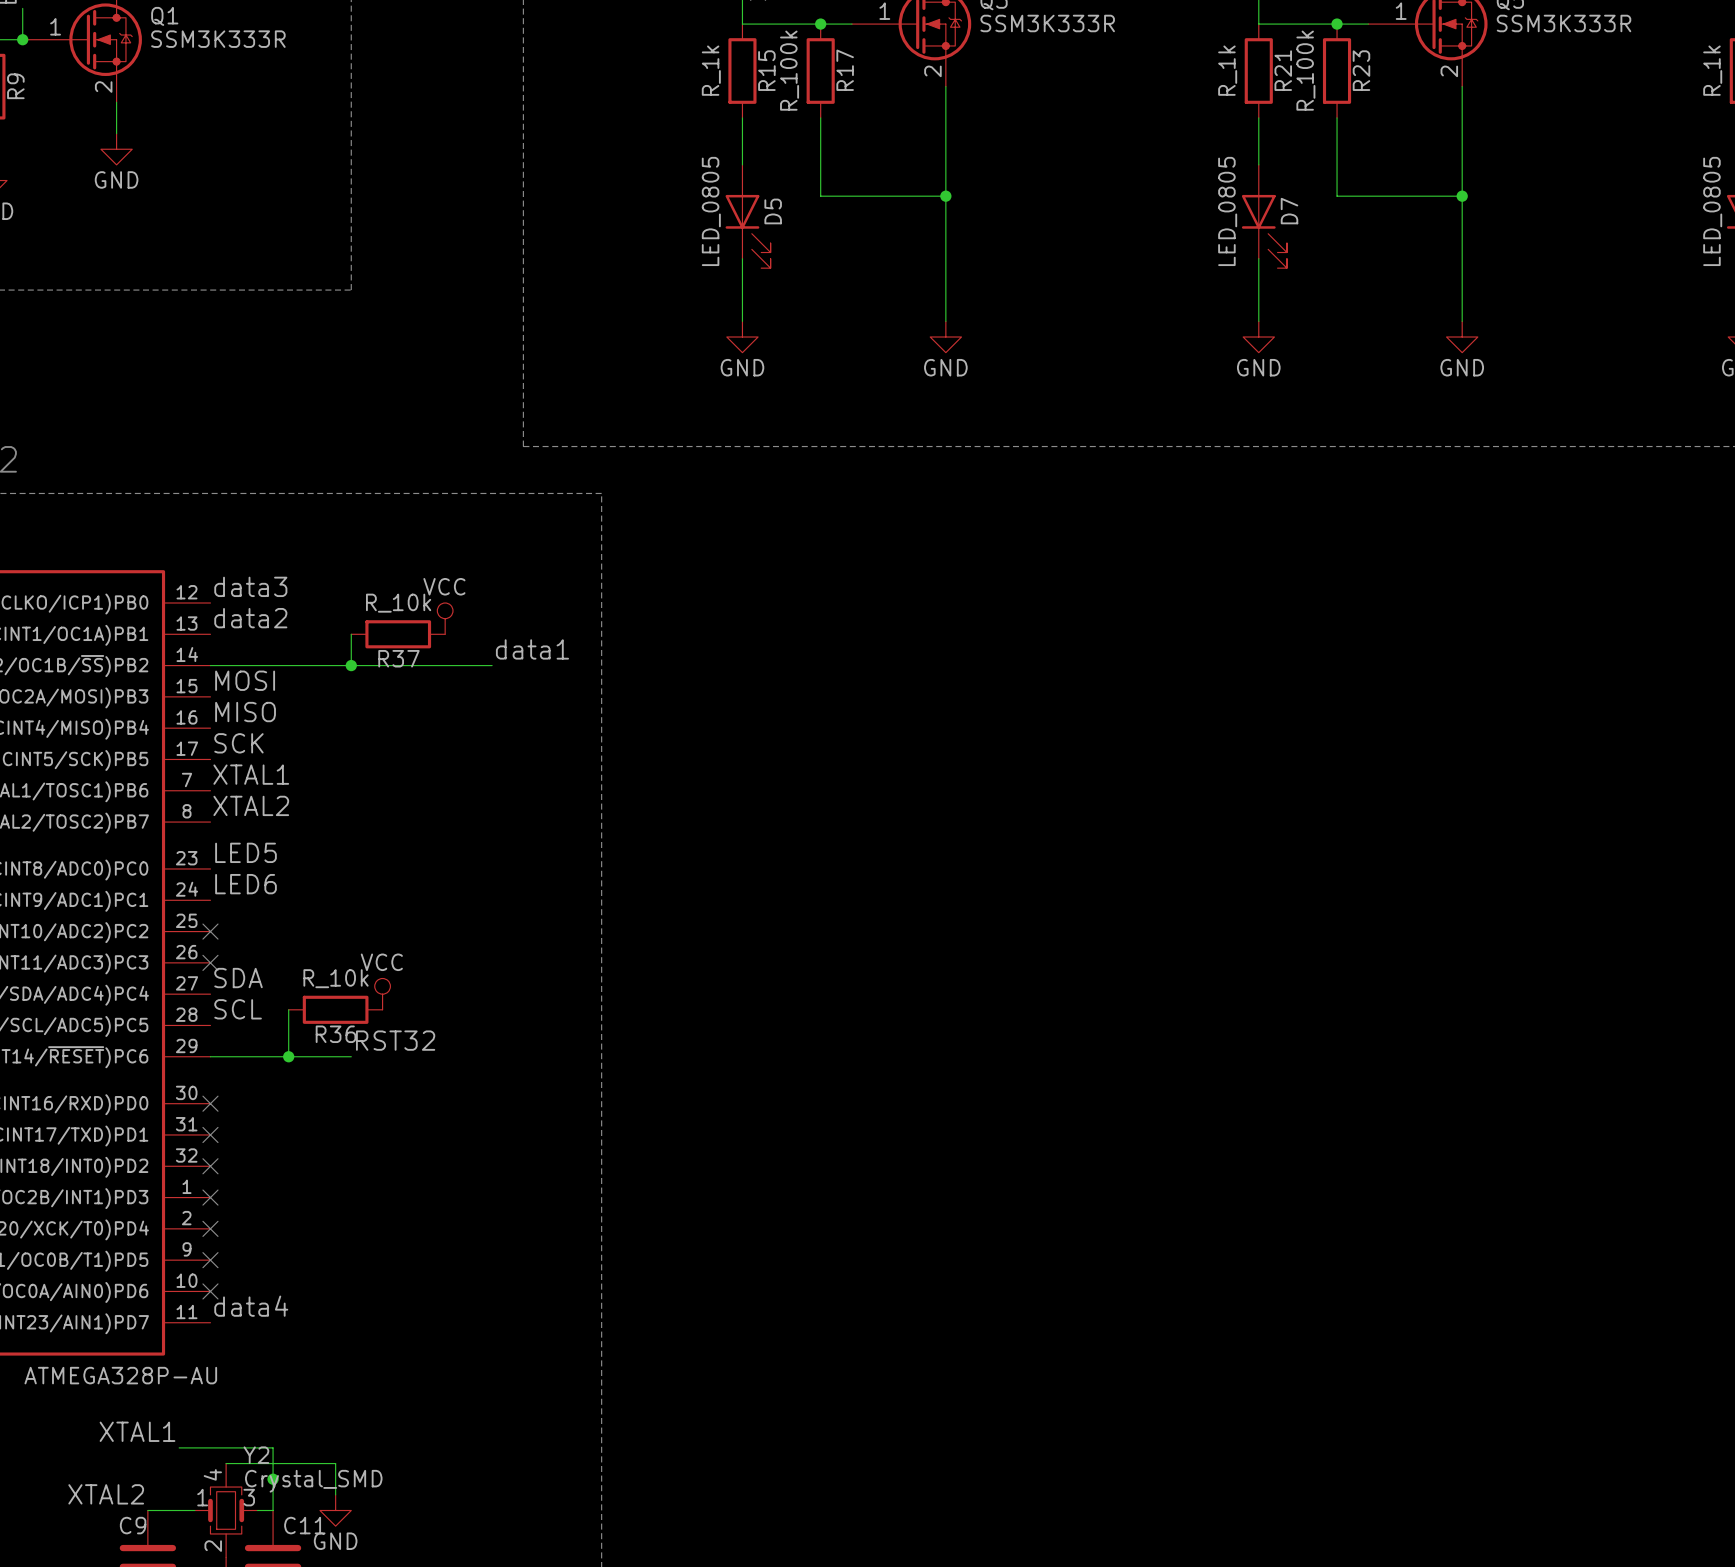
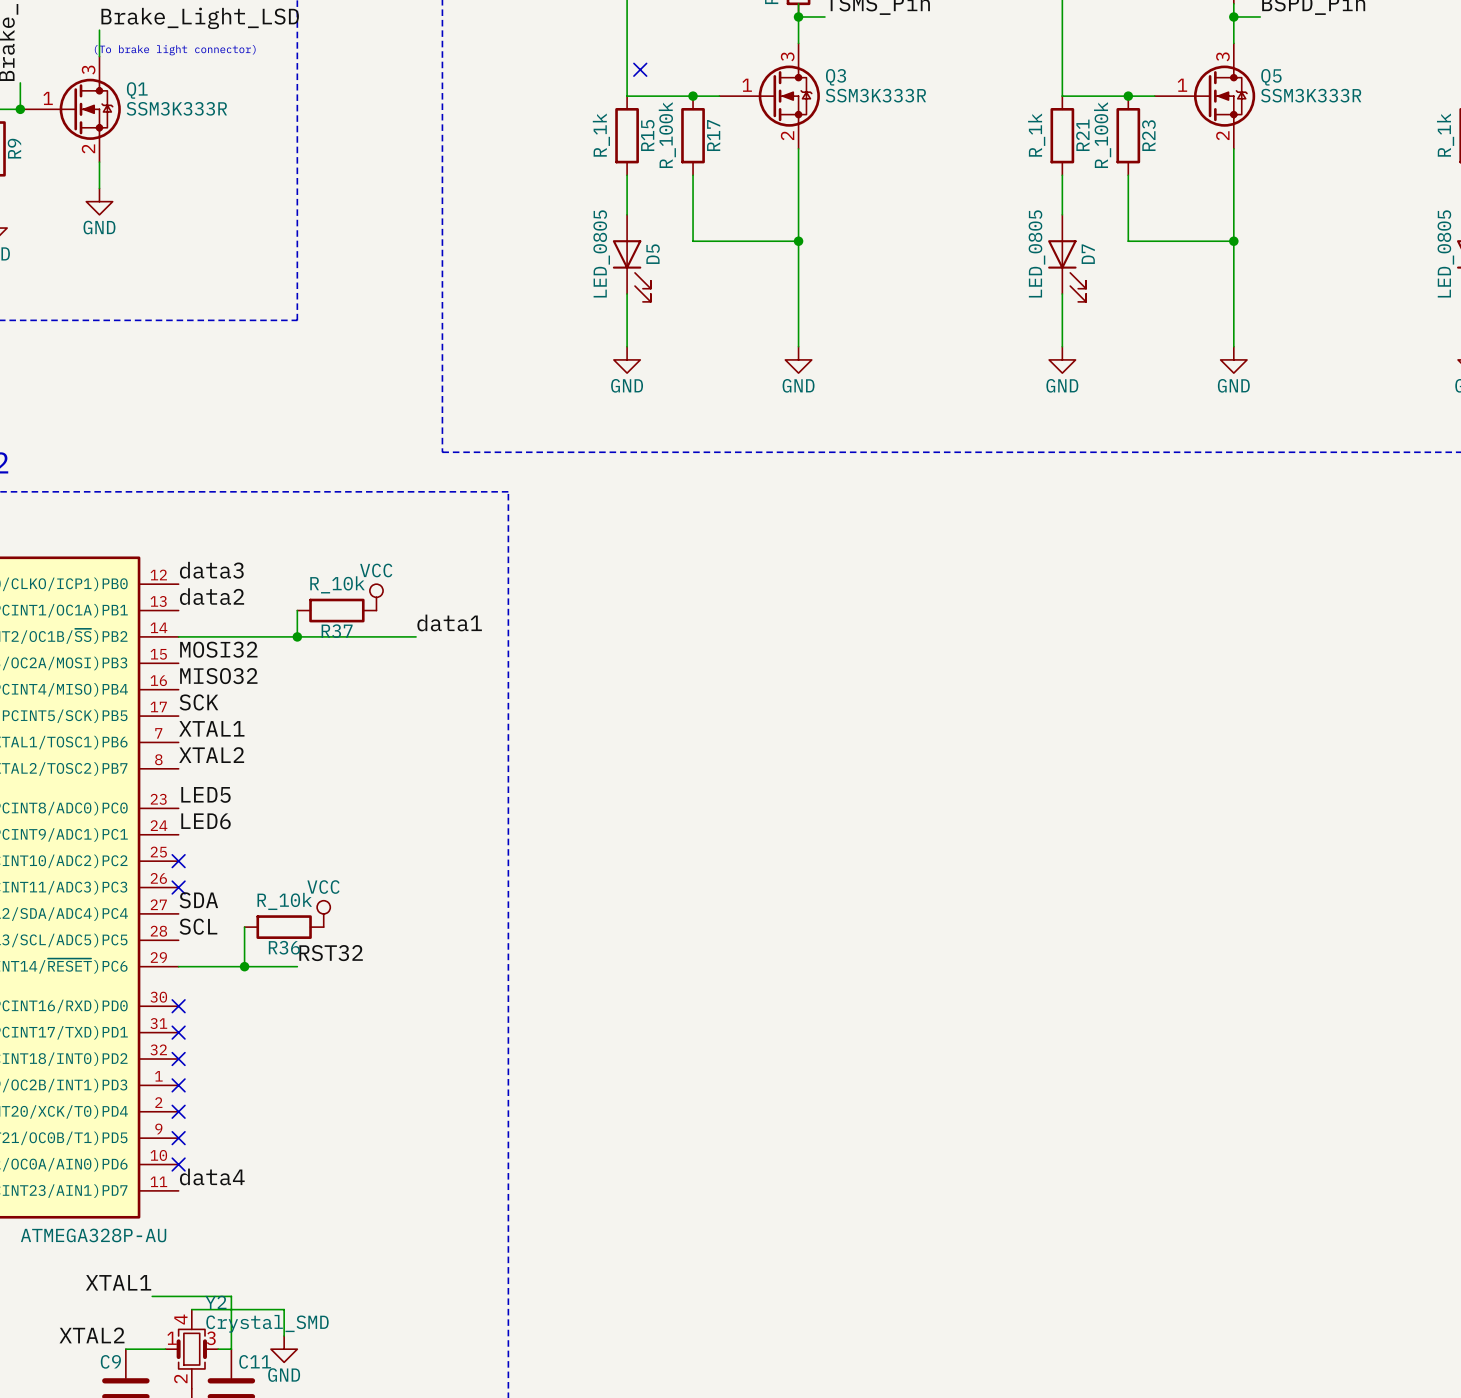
label: MOSI (245, 680) -> MOSI32 (218, 649)
label: MISO (245, 712) -> MISO32 (218, 676)
junction: (273, 1479) -> none

